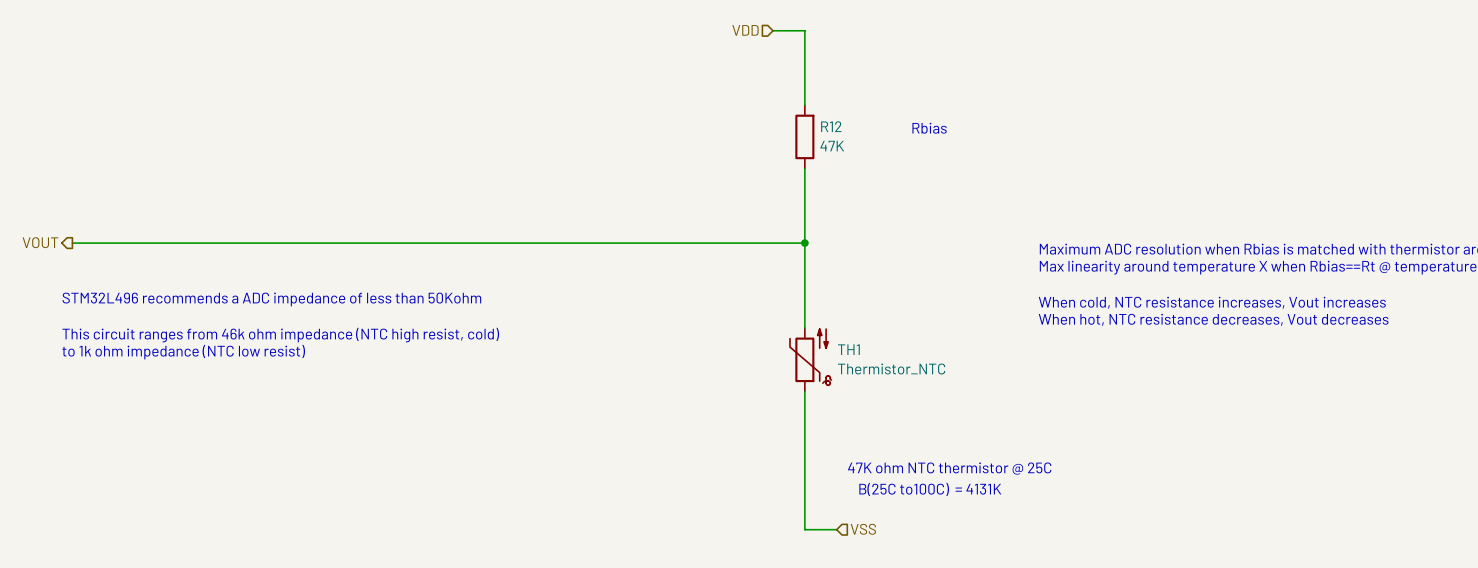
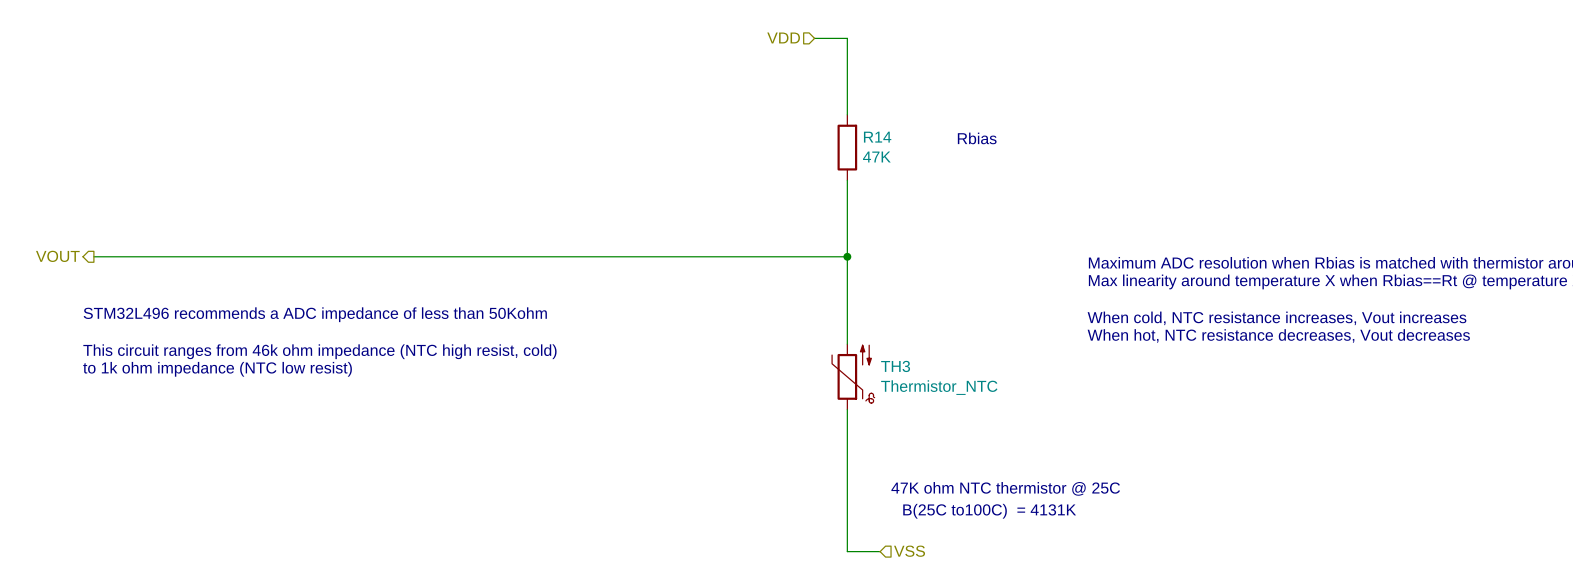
R12 name: R12 (831, 126) -> R14 (877, 137)
TH1 name: TH1 (848, 349) -> TH3 (895, 366)

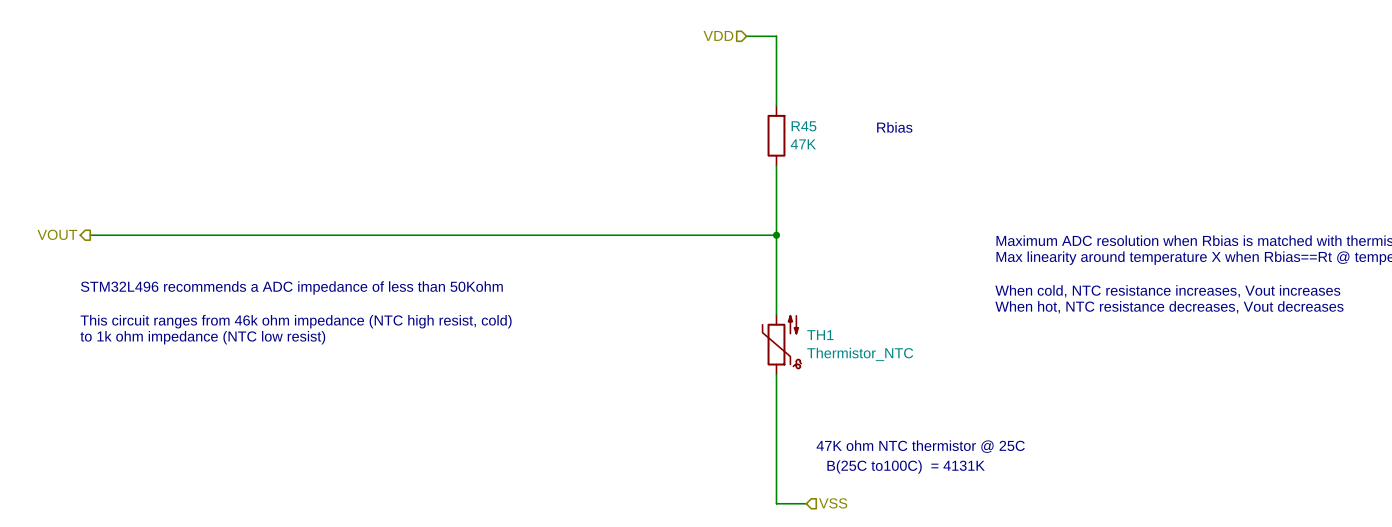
R14 name: R14 (877, 137) -> R45 (803, 126)
TH3 name: TH3 (895, 366) -> TH1 (820, 335)

